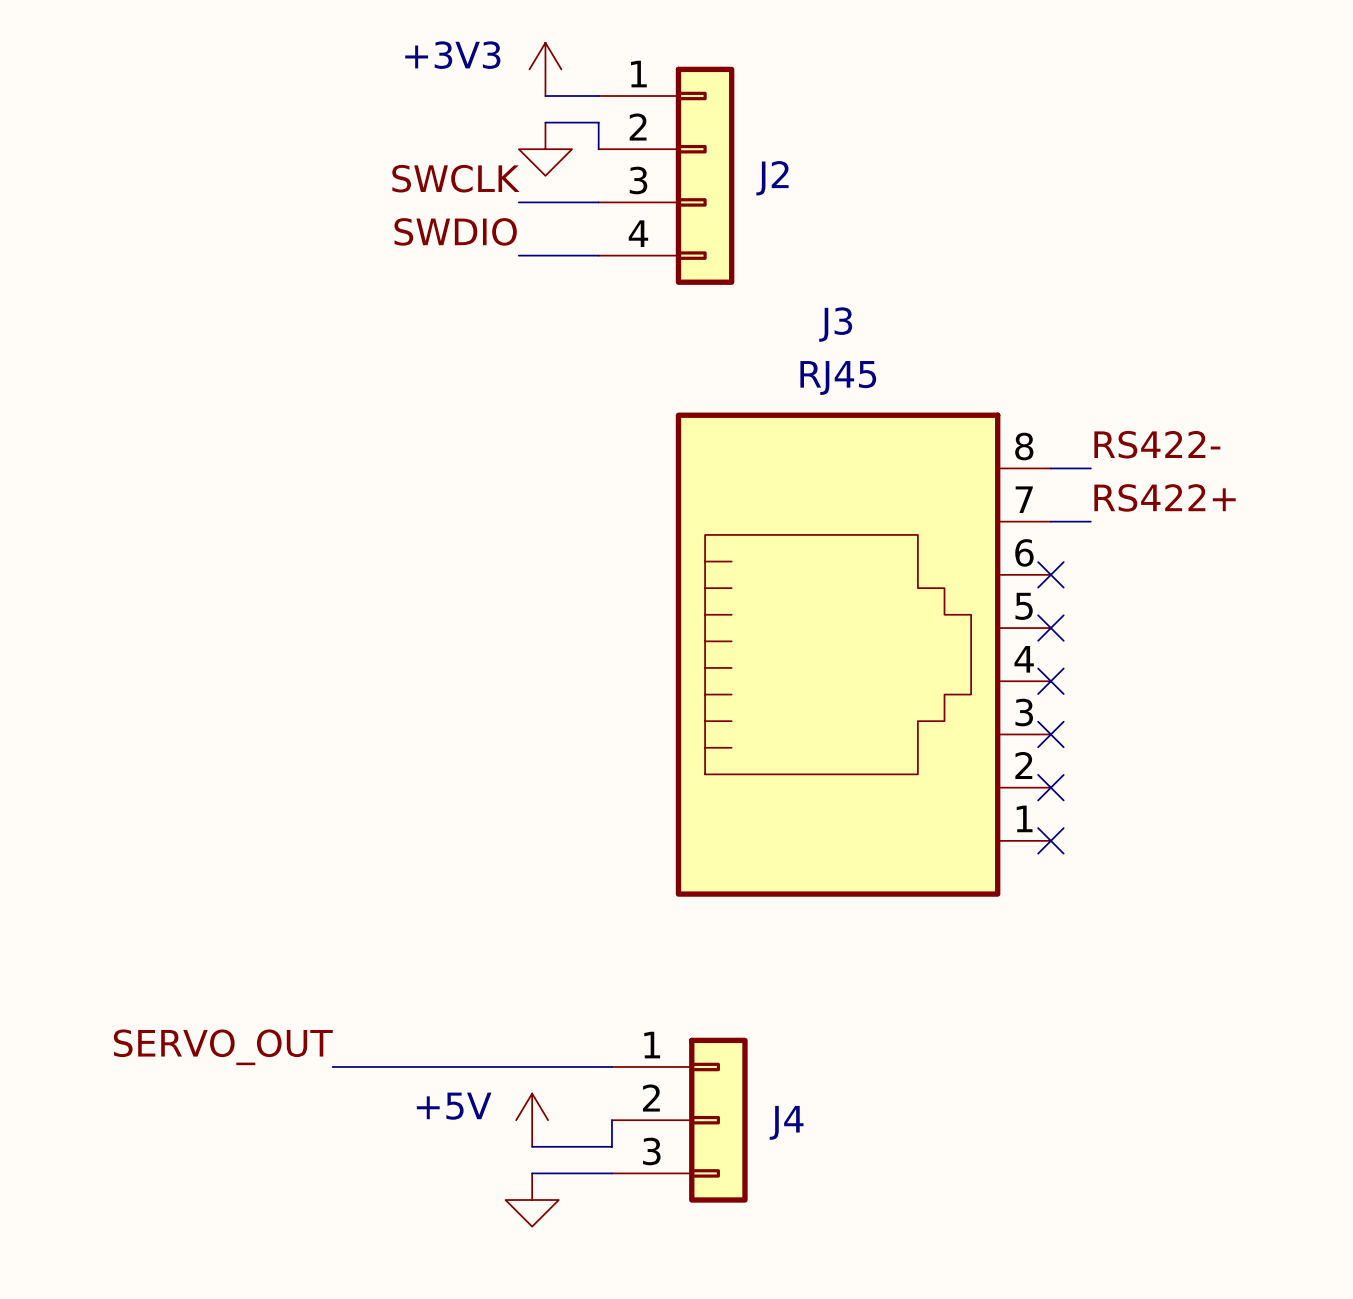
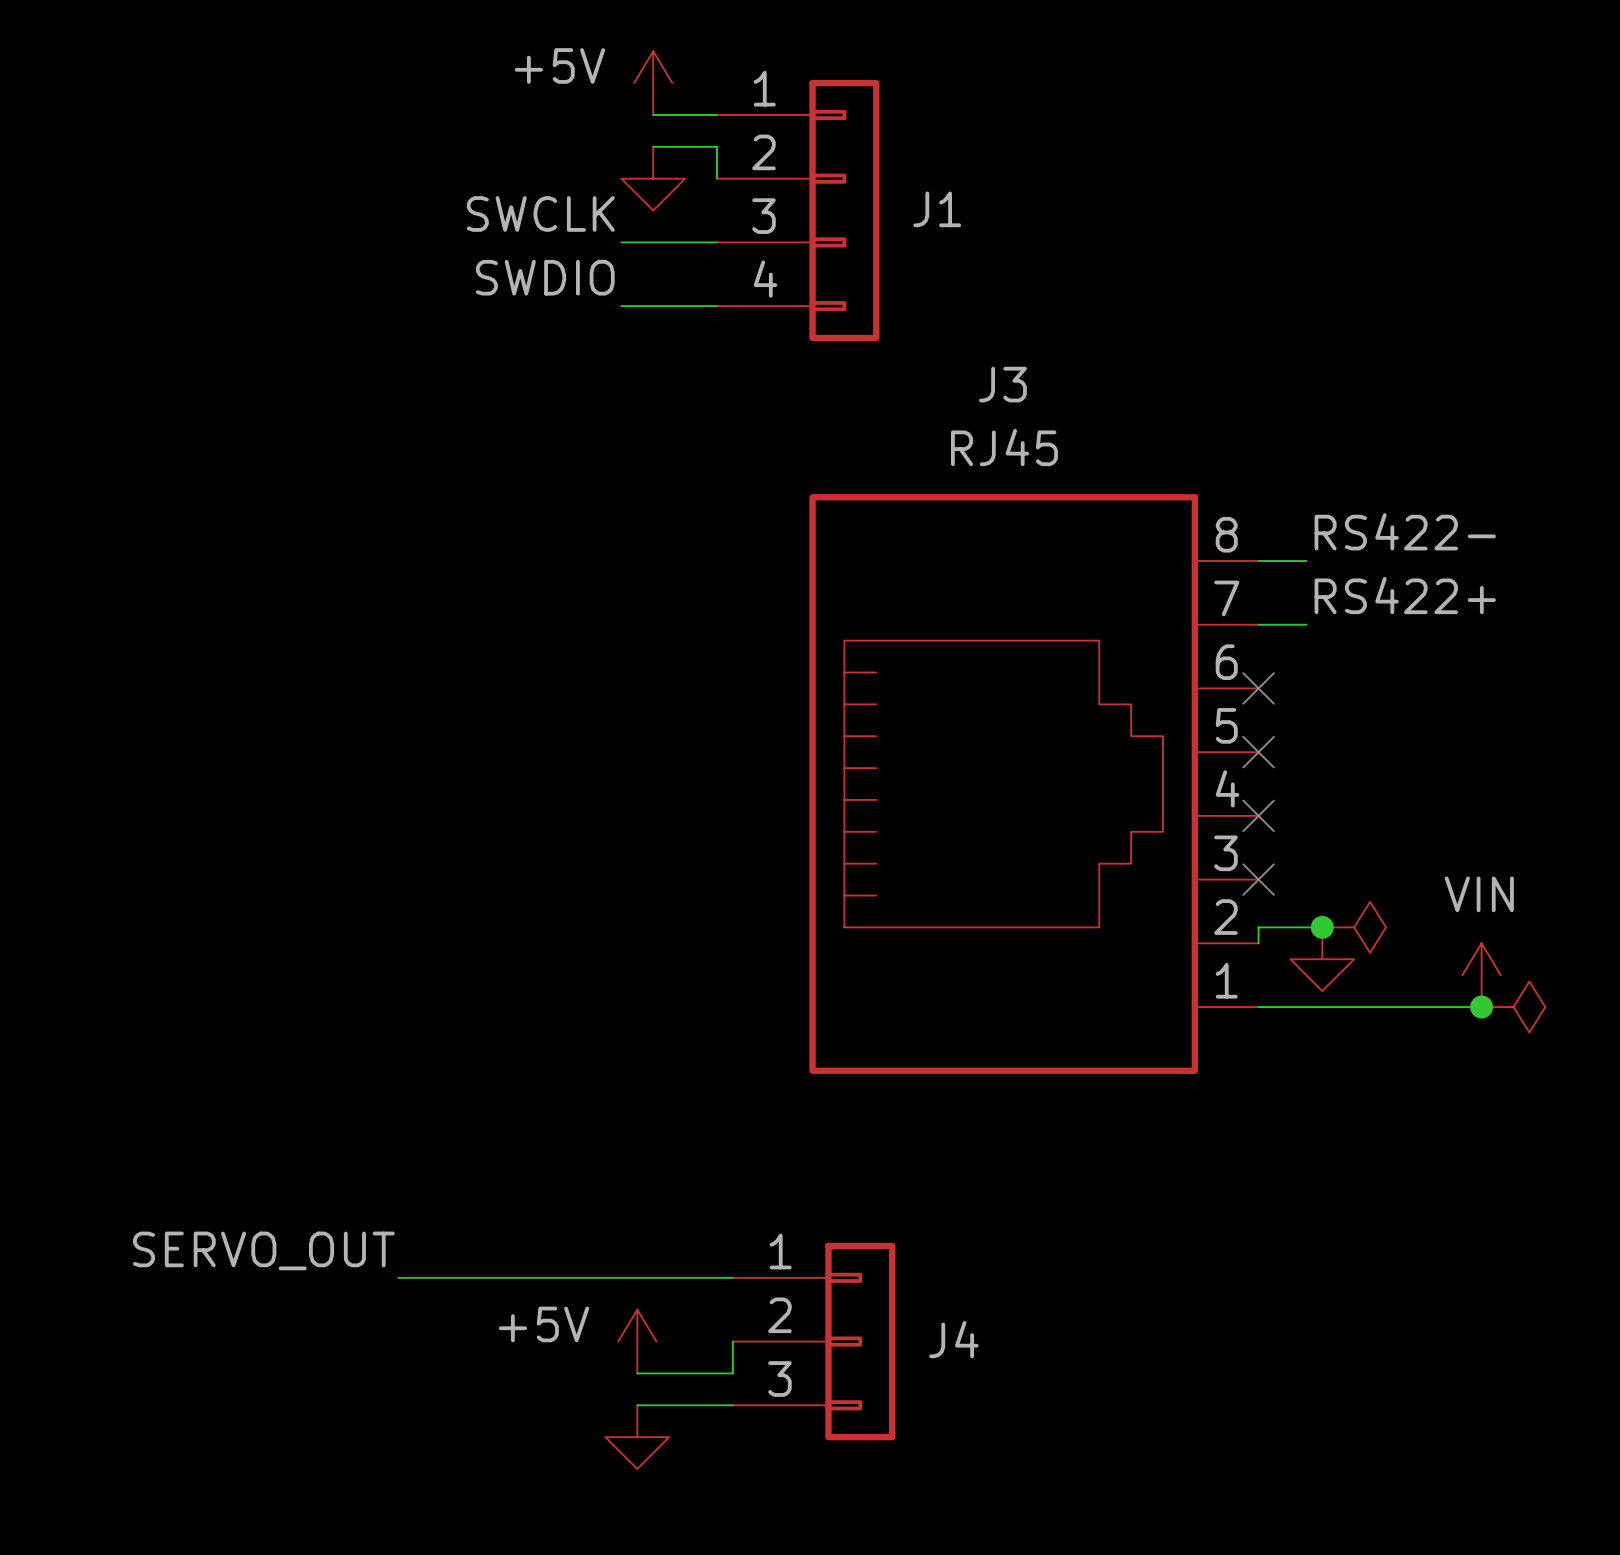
power symbol: +3V3 (545, 69) -> +5V (653, 83)
J2 name: J2 (772, 178) -> J1 (937, 209)
wire: none -> (1322, 927) (1258, 927) (1258, 943)
junction: none -> (1322, 927)
power symbol: none -> (1354, 927)
no-connect mark: (1050, 787) -> none
power symbol: none -> (1322, 959)
power symbol: none -> VIN (1481, 975)
wire: none -> (1258, 1007) (1481, 1007)
no-connect mark: (1050, 840) -> none
junction: none -> (1481, 1007)
power symbol: none -> (1513, 1007)

